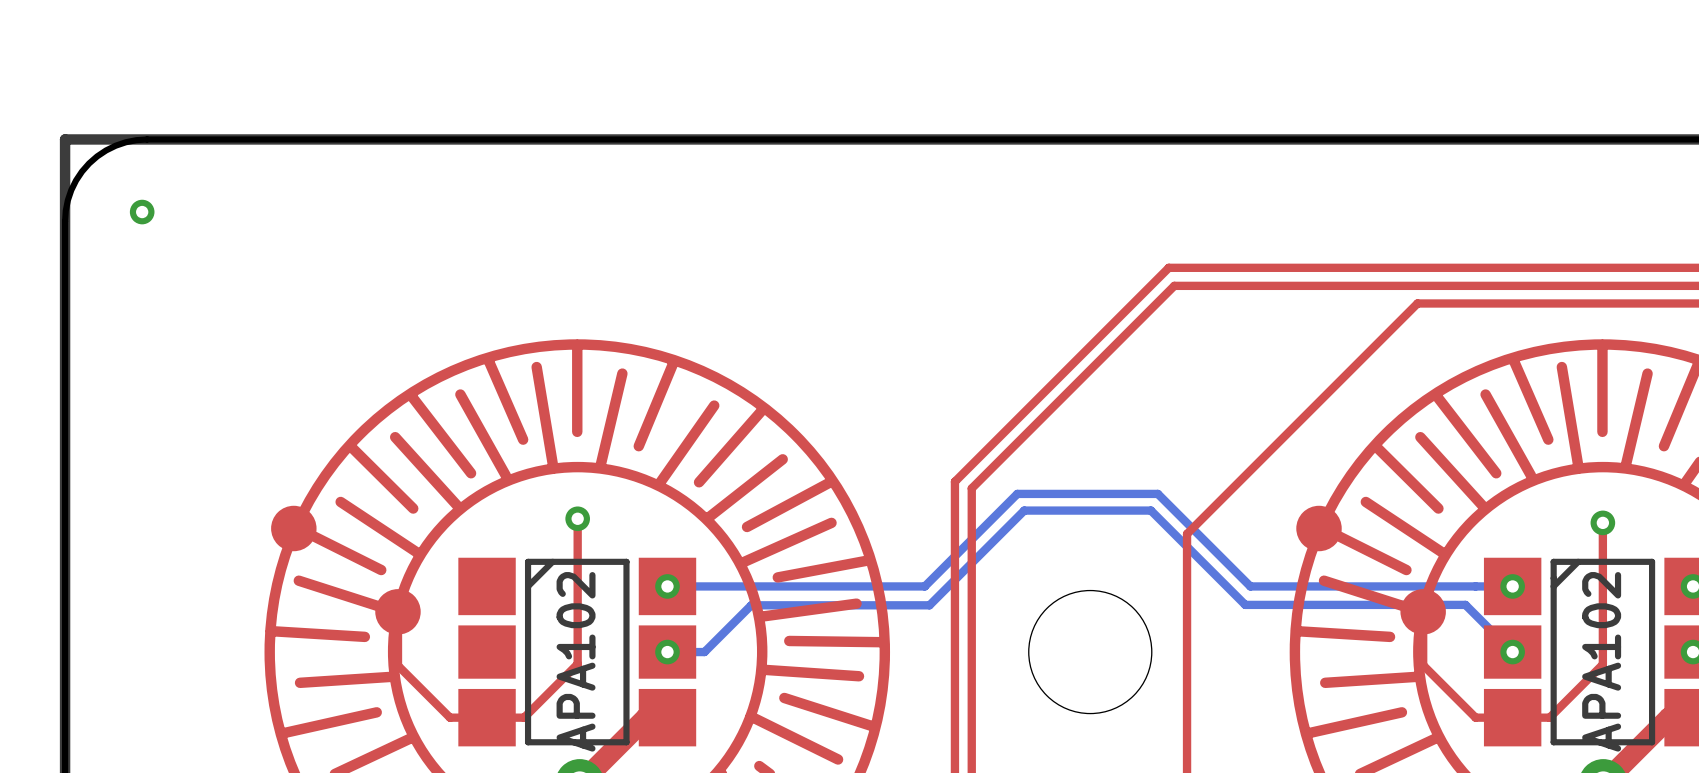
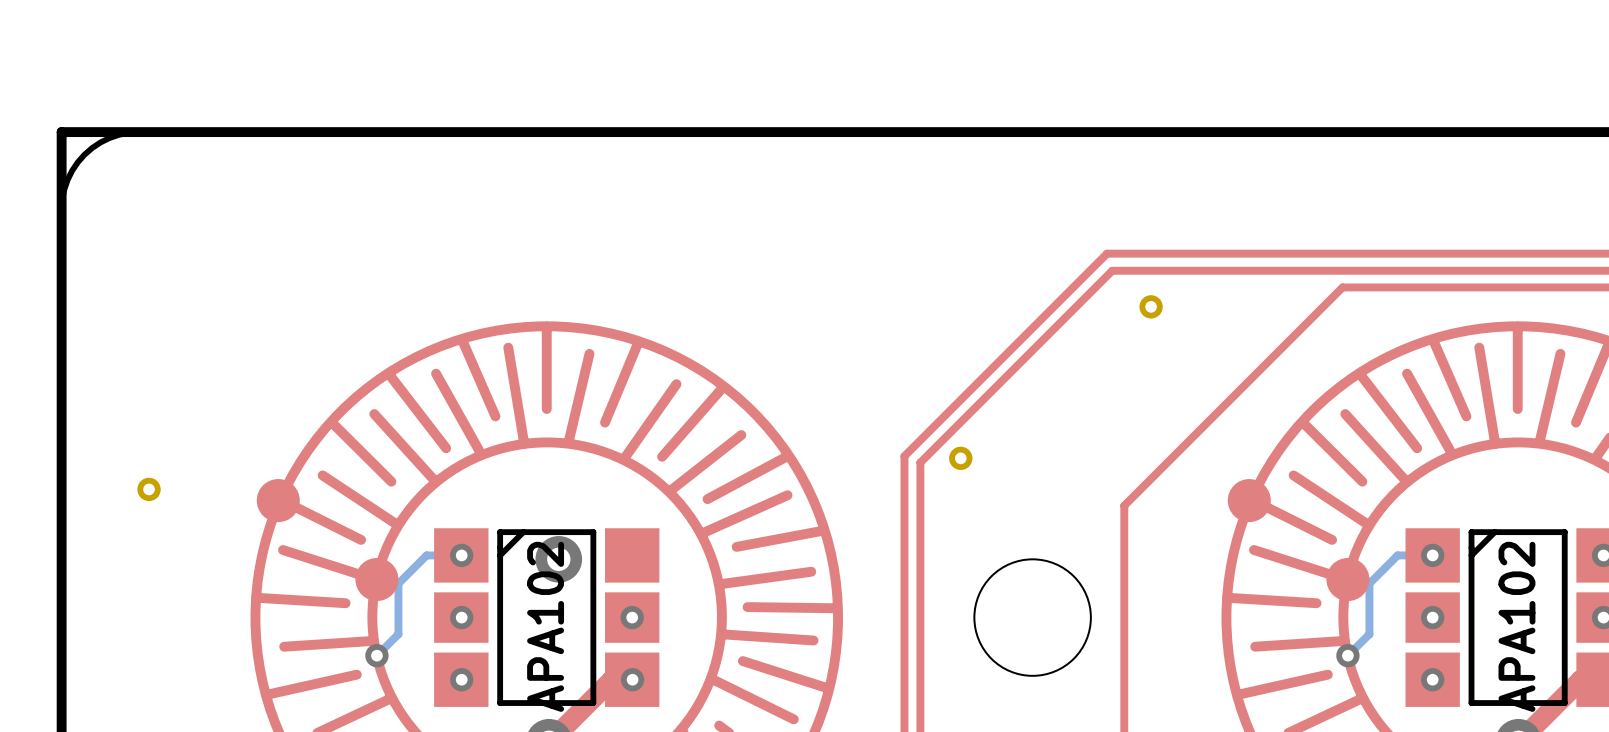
part position: (142, 212) -> (149, 489)
part: none -> (1151, 306)
part: none -> (960, 458)
top track: (577, 518) (577, 664) (524, 717) (450, 717) (397, 665) (397, 611) -> none
via: (577, 518) -> none
top track: (1602, 522) (1602, 664) (1549, 717) (1475, 717) (1423, 665) (1423, 611) -> none
via: (1602, 522) -> none
bottom track: none -> (461, 555) (426, 555) (398, 583) (398, 634) (376, 655)
via: none -> (461, 555)
bottom track: (667, 586) (924, 586) (1017, 493) (1157, 493) (1250, 586) (1475, 586) -> (1347, 655) (1369, 634) (1369, 583) (1397, 555)
via: (667, 586) -> none
via: none -> (558, 559)
via: none -> (461, 617)
bottom track: (667, 652) (704, 652) (751, 605) (929, 605) (1024, 510) (1150, 510) (1245, 604) (1465, 604) (1512, 652) -> none
via: none -> (376, 655)
via: none -> (1347, 655)
via: none -> (461, 679)
via: none -> (632, 679)
via: none -> (1432, 679)

